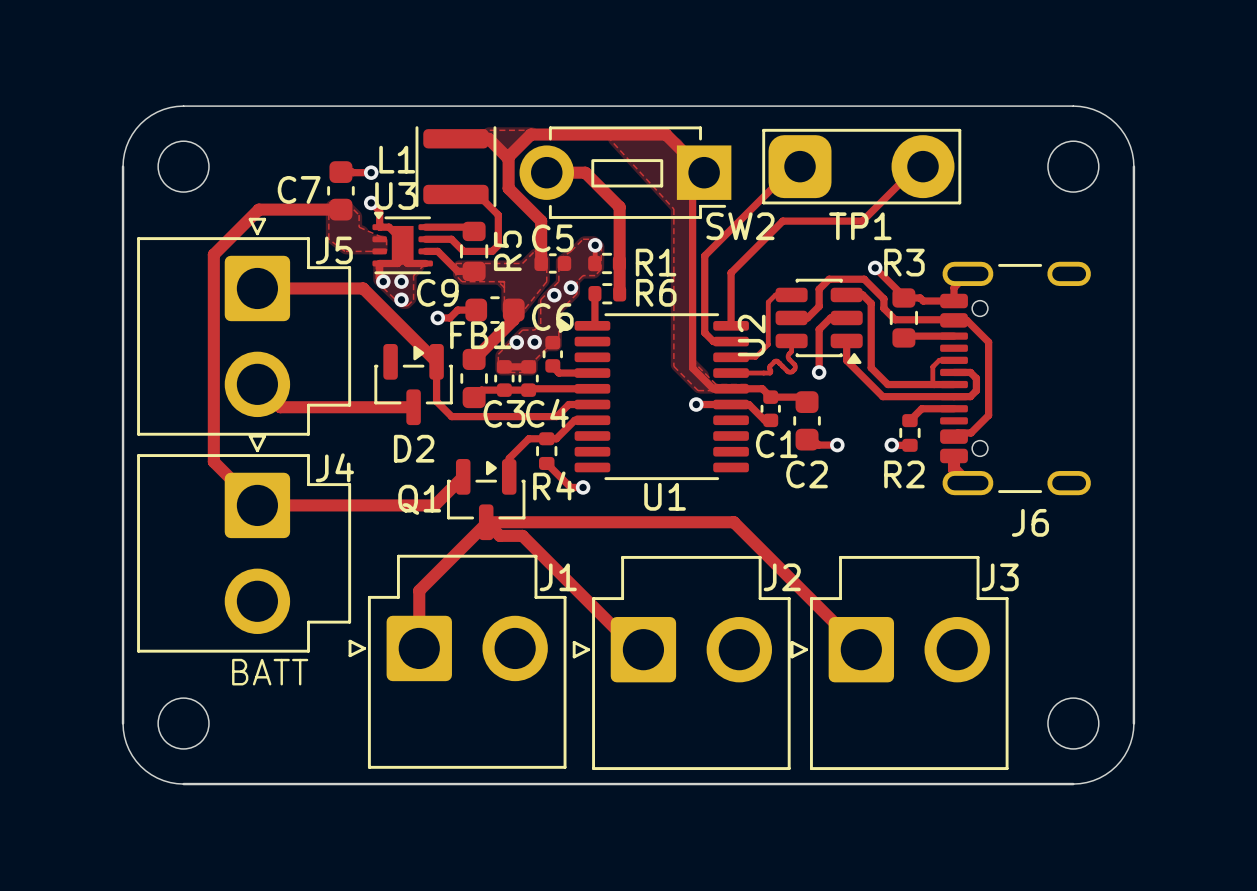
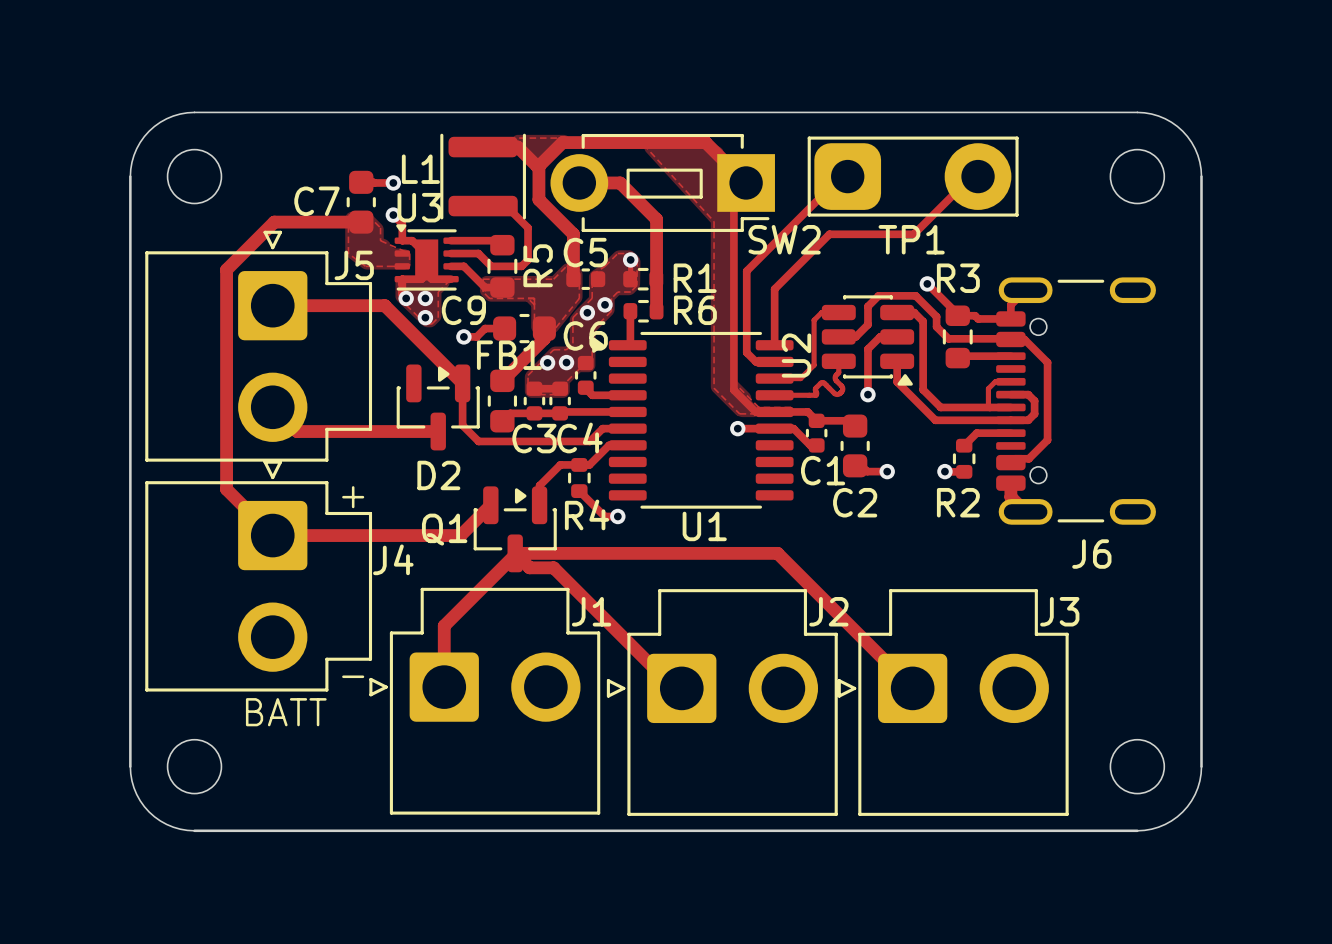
J4 name position: J4 (334, 467) -> J4 (393, 559)
text: none -> + (353, 497)
text: none -> - (353, 676)

